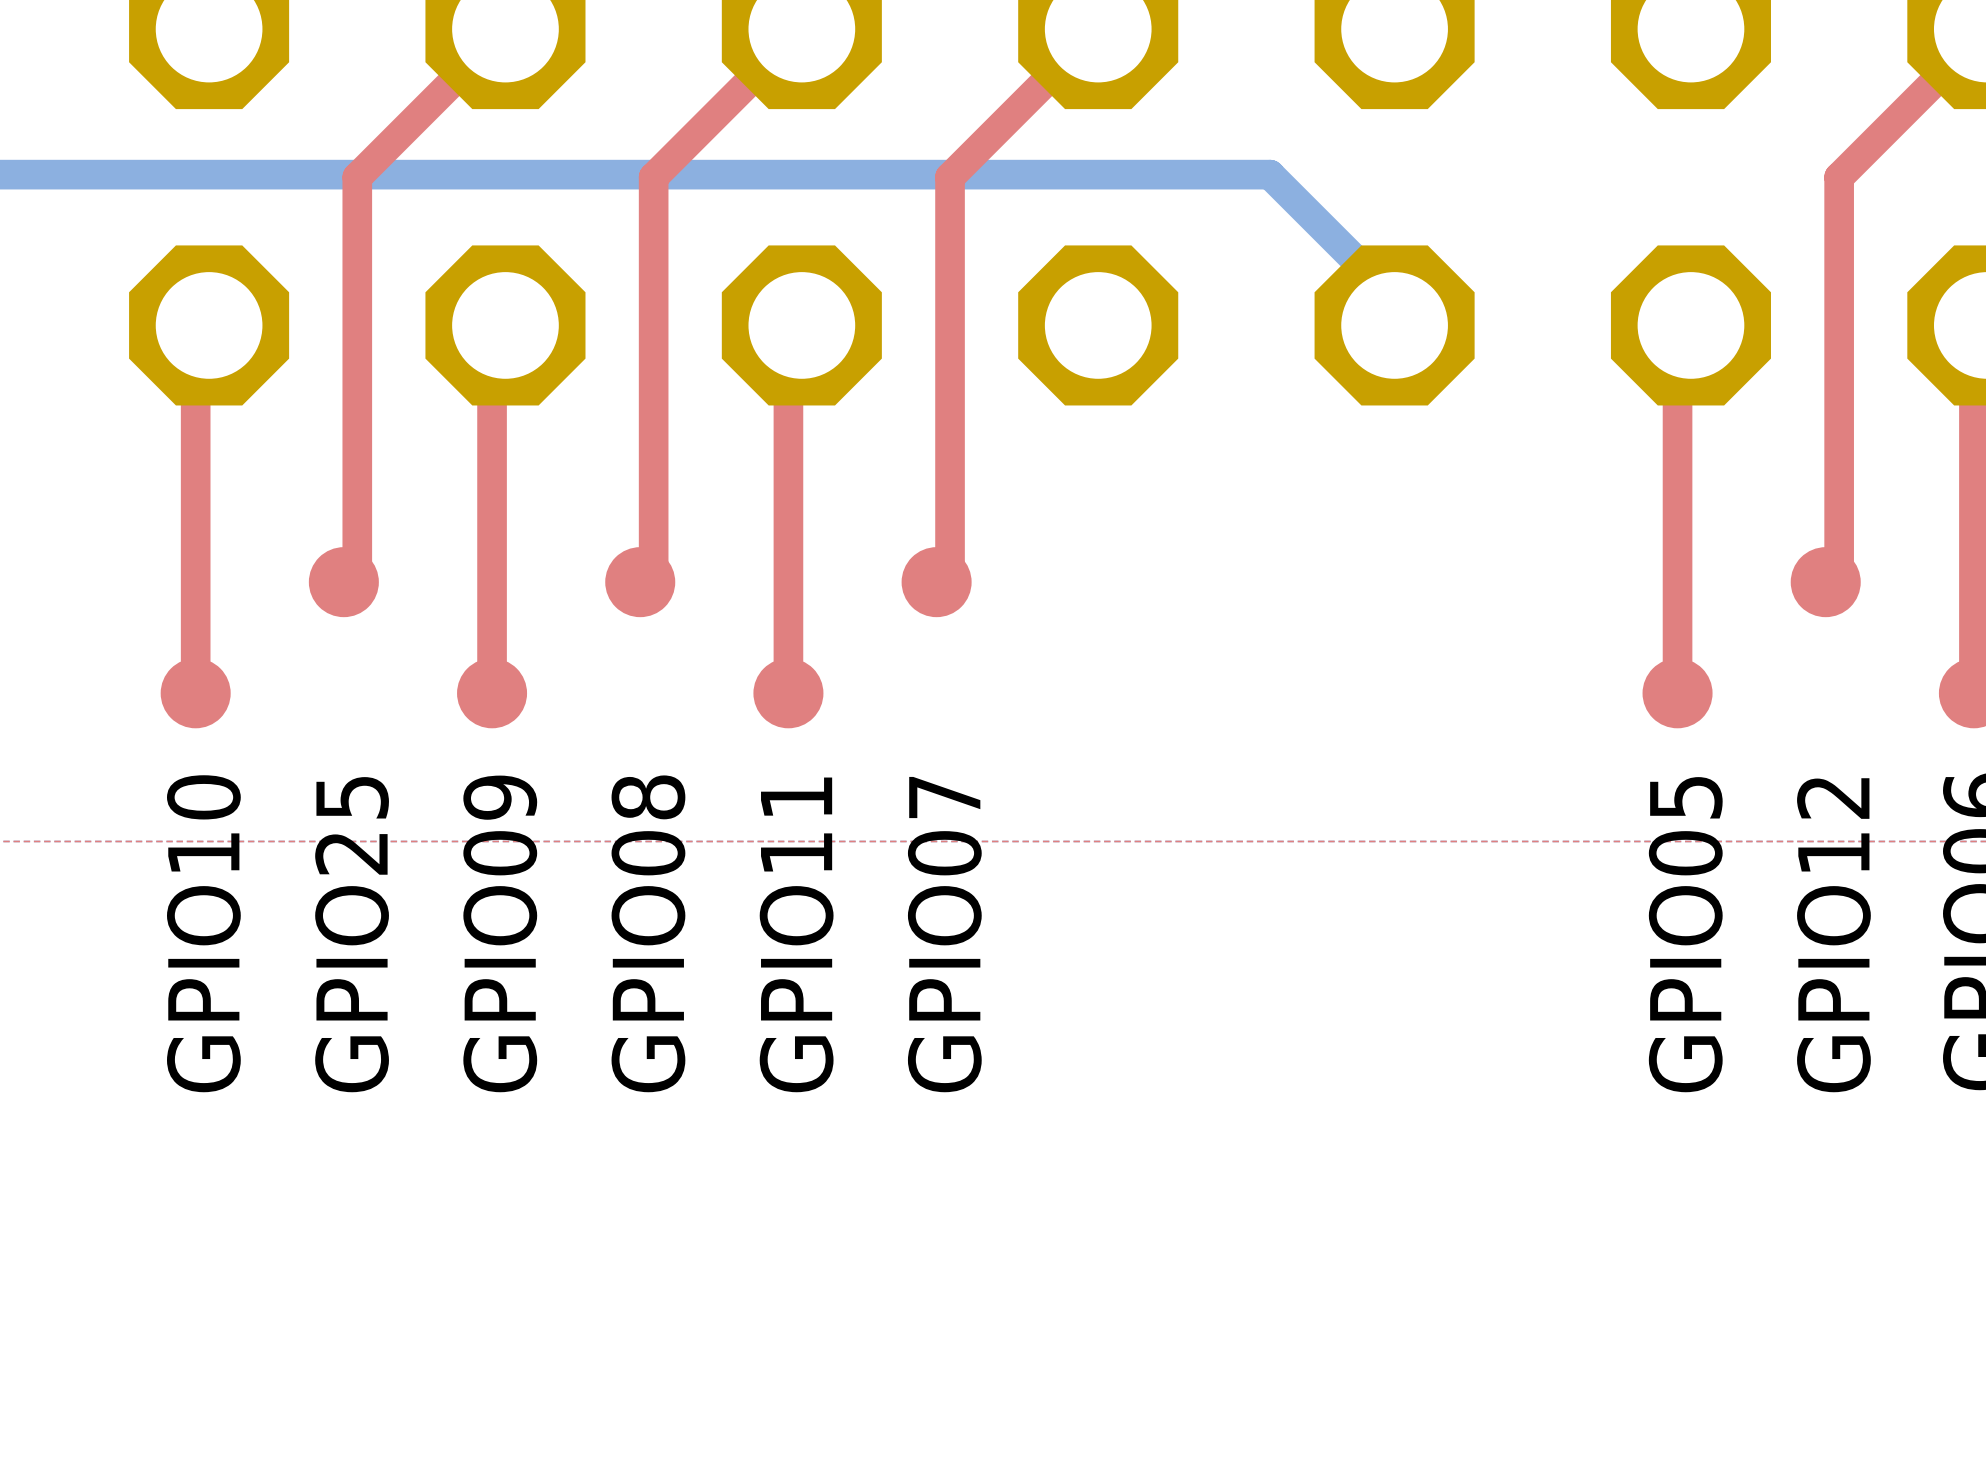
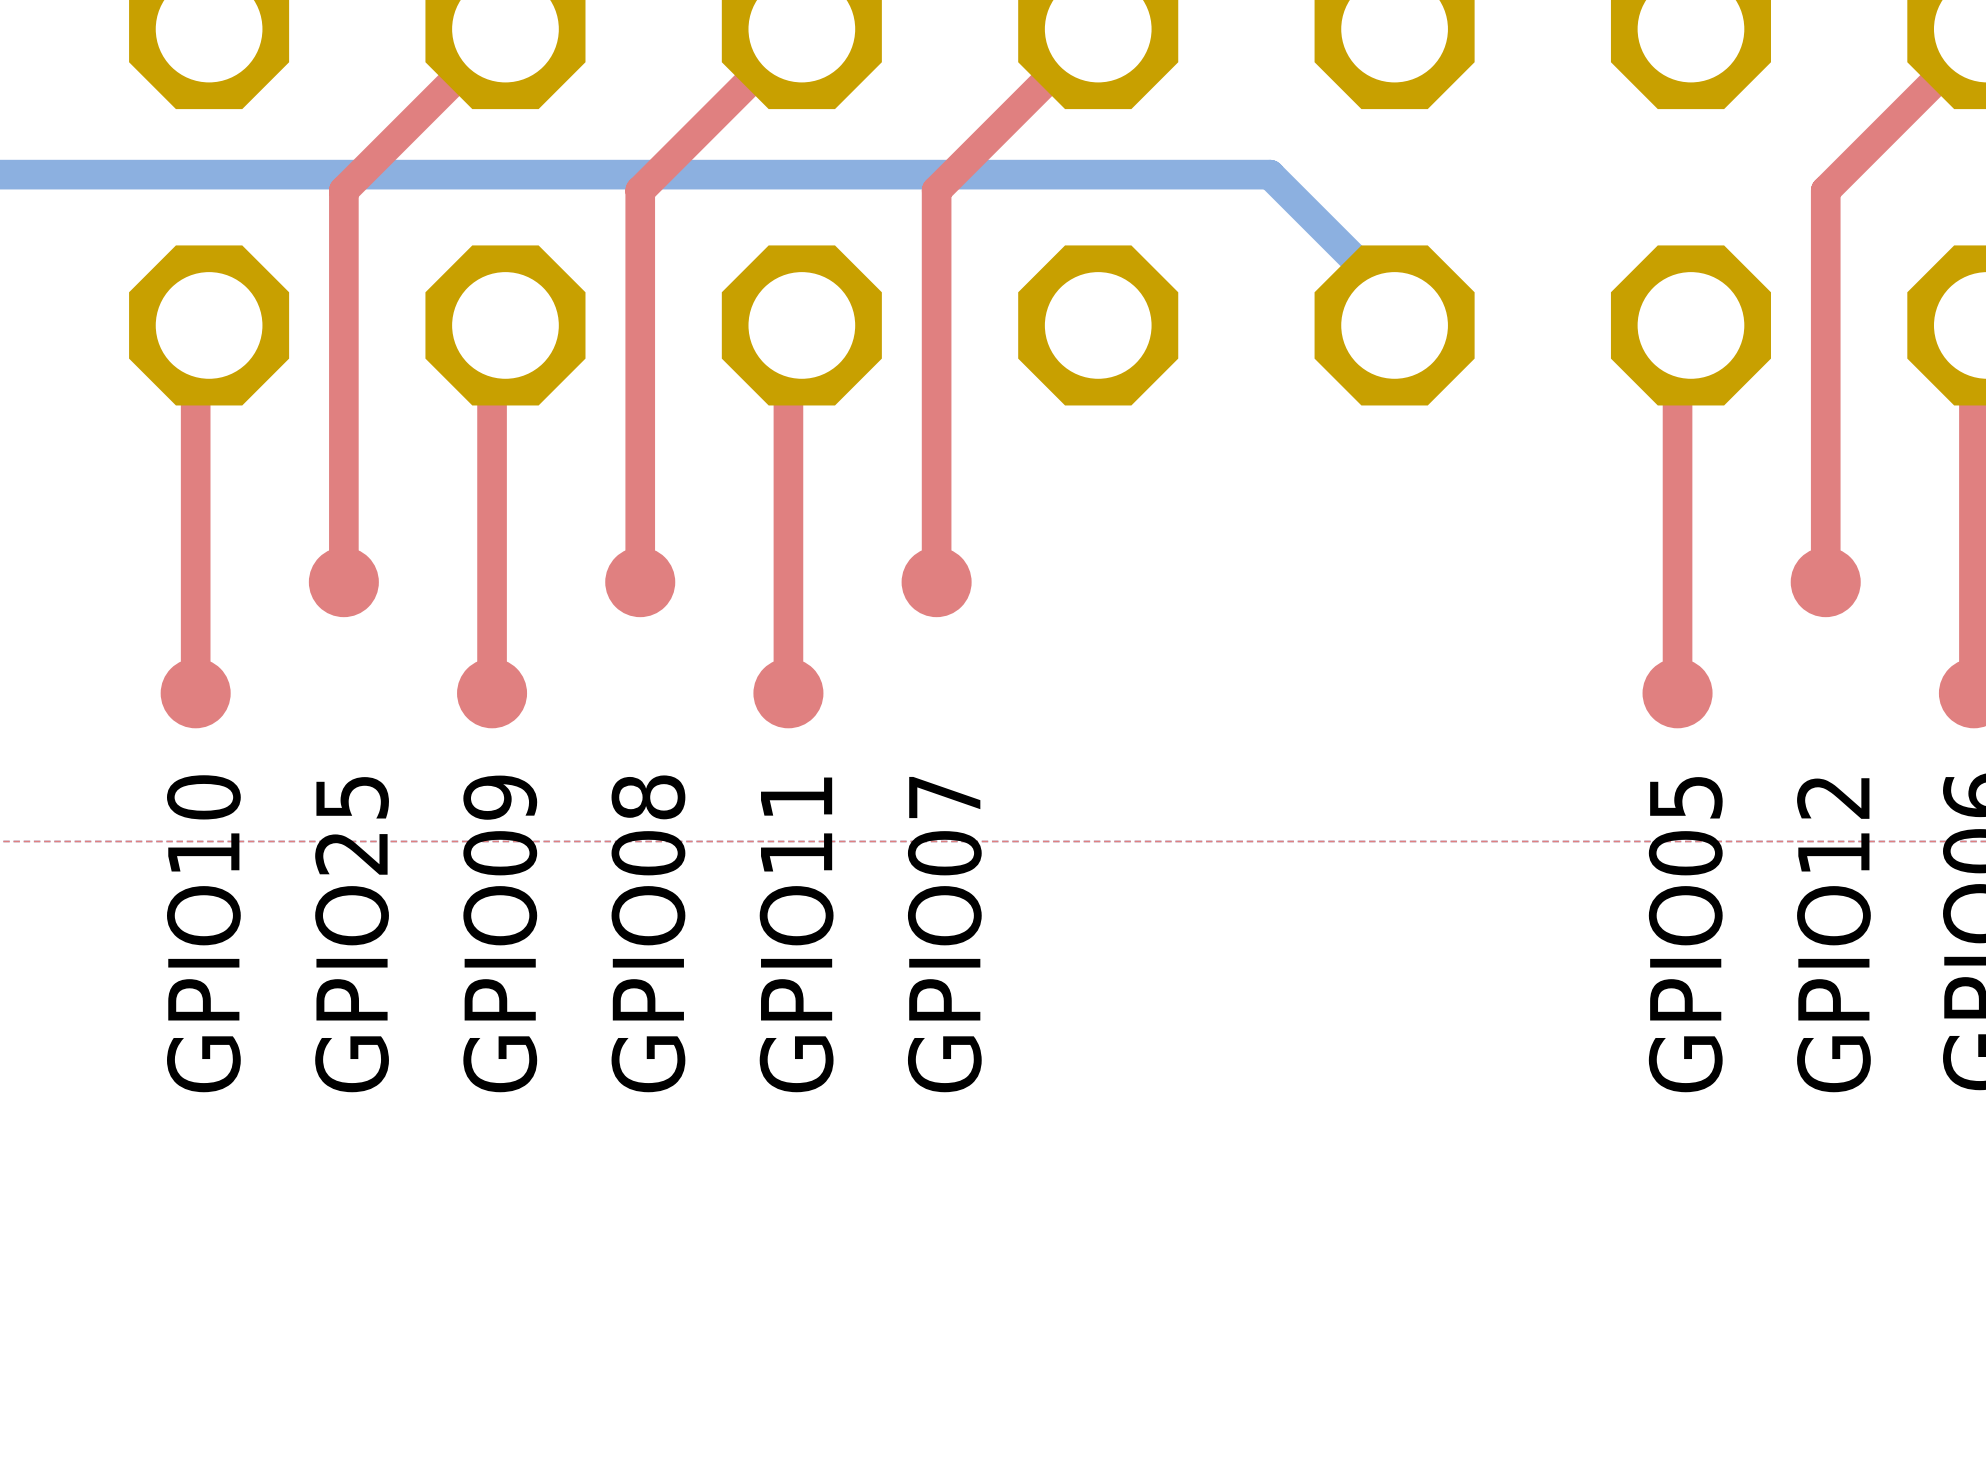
top track: (357, 177) (357, 582) (343, 595) (343, 582) -> (357, 177) (343, 190) (343, 582)
top track: (653, 177) (653, 582) (640, 595) (640, 582) -> (653, 177) (640, 190) (640, 582)
top track: (950, 177) (950, 582) (936, 595) (936, 582) -> (950, 177) (936, 190) (936, 582)
top track: (1839, 177) (1839, 582) (1825, 595) (1825, 582) -> (1839, 177) (1825, 190) (1825, 582)

